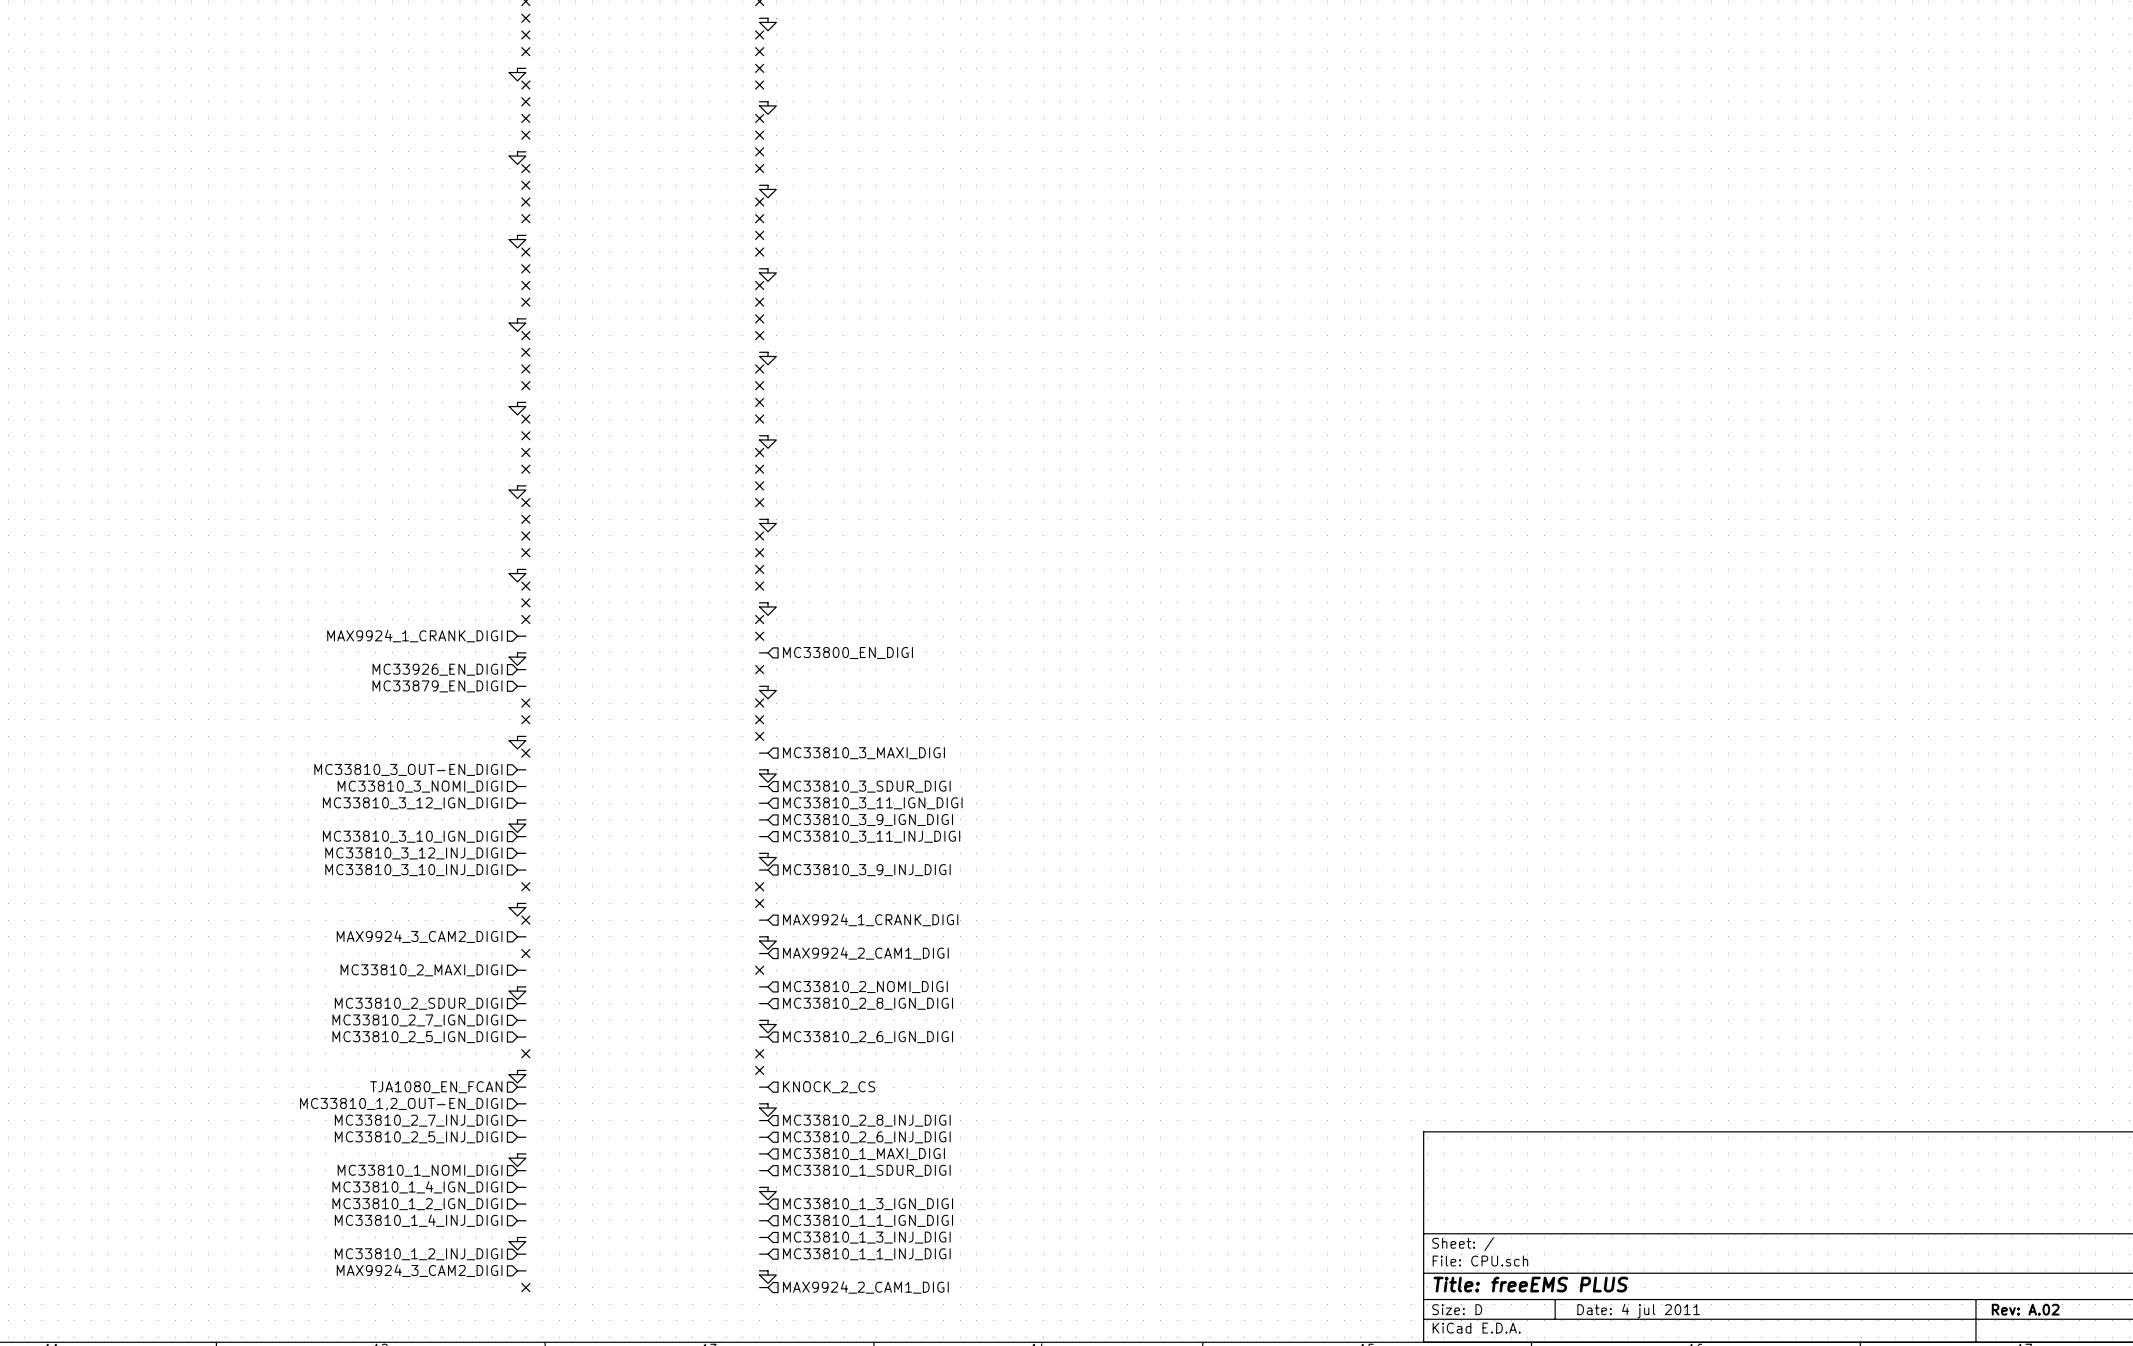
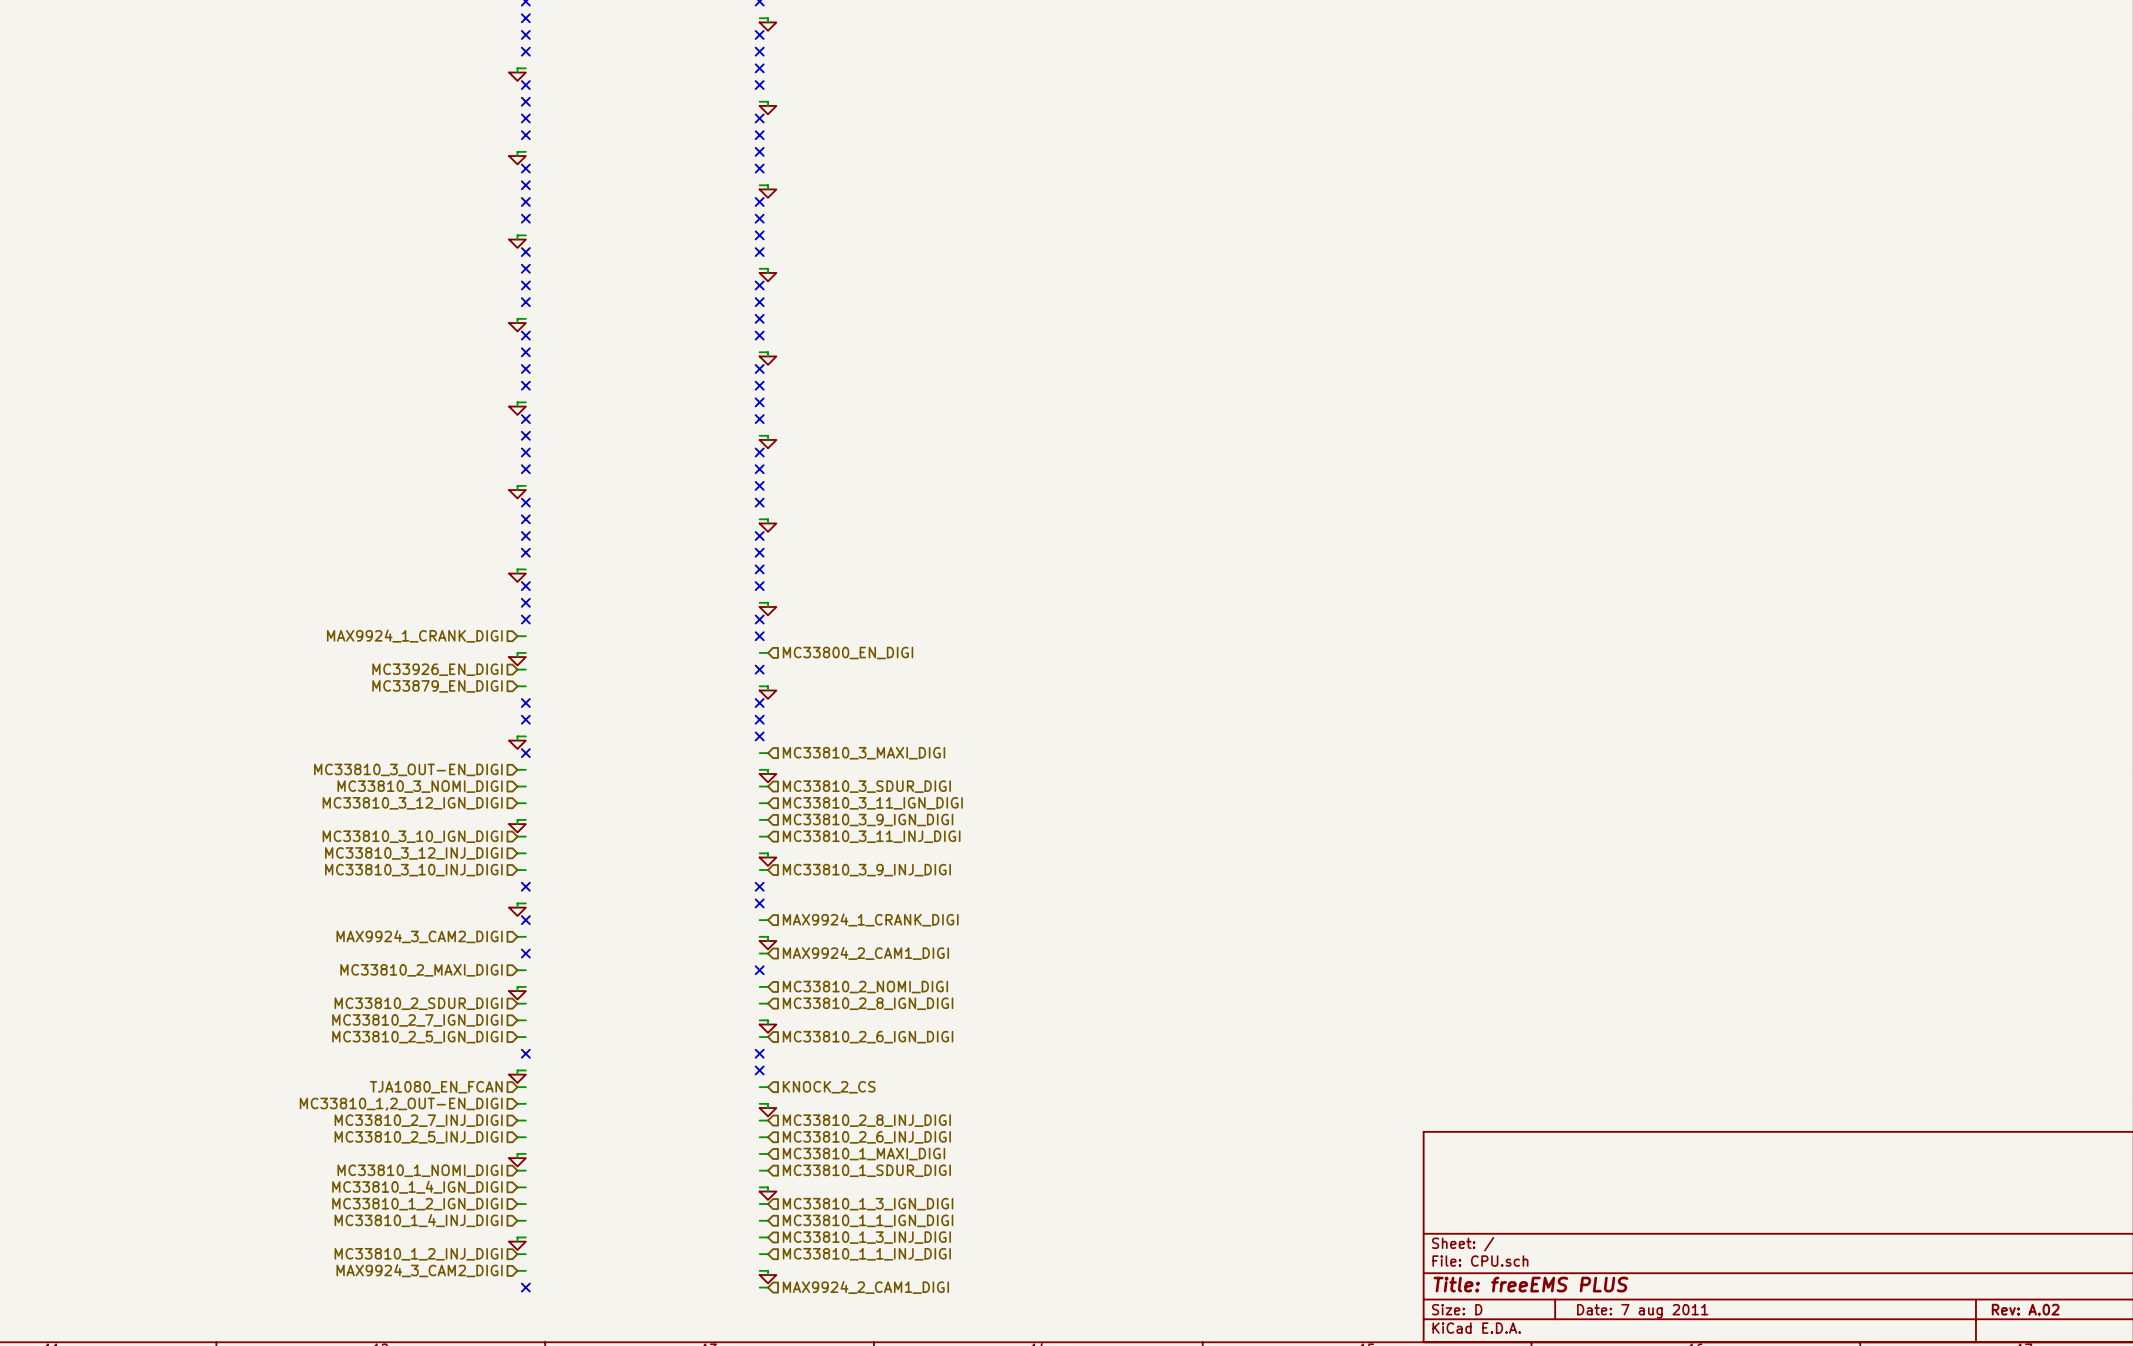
title block: Date: 4 jul 2011 (1638, 1311) -> Date: 7 aug 2011 (1642, 1311)

